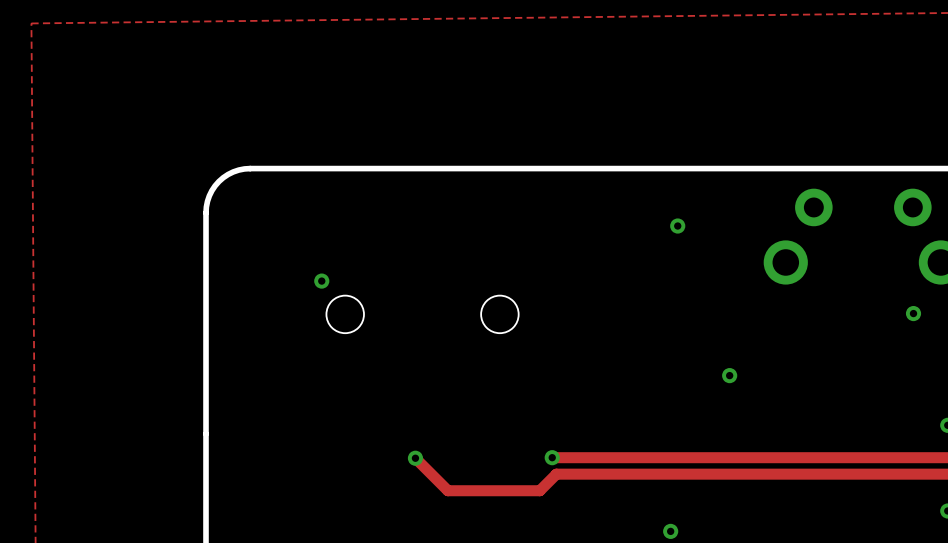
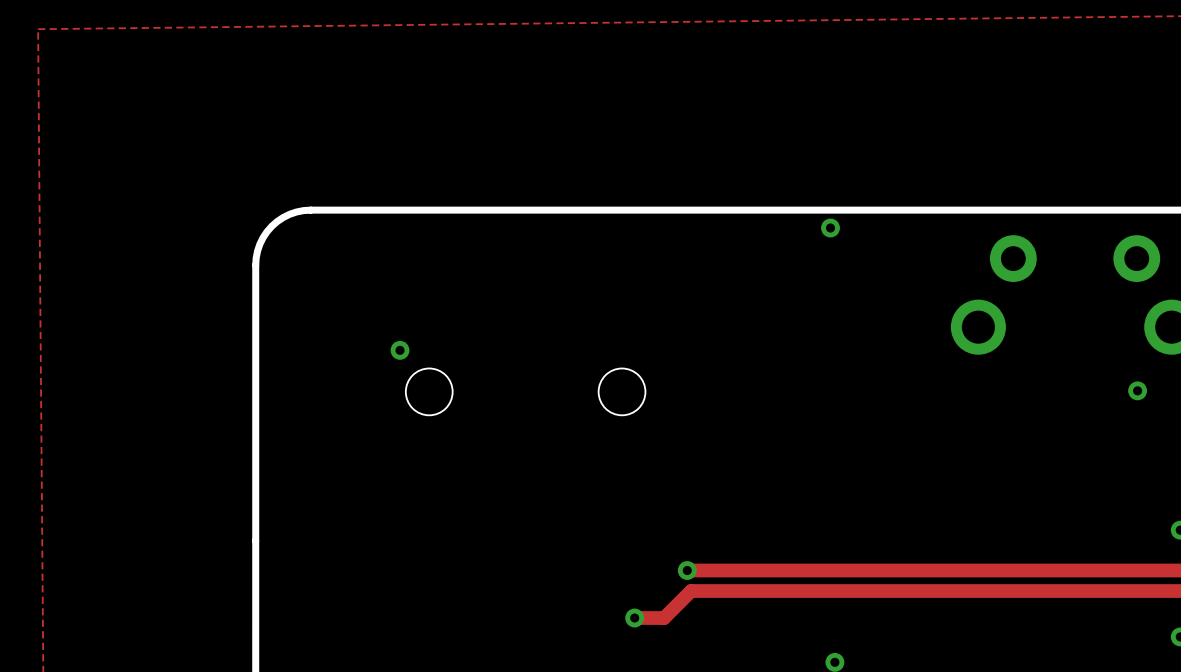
via position: (677, 226) -> (830, 228)
via: (729, 375) -> none
track: (415, 458) (447, 490) (539, 490) (556, 474) -> (634, 618) (664, 618) (692, 591)
via position: (415, 458) -> (634, 618)

